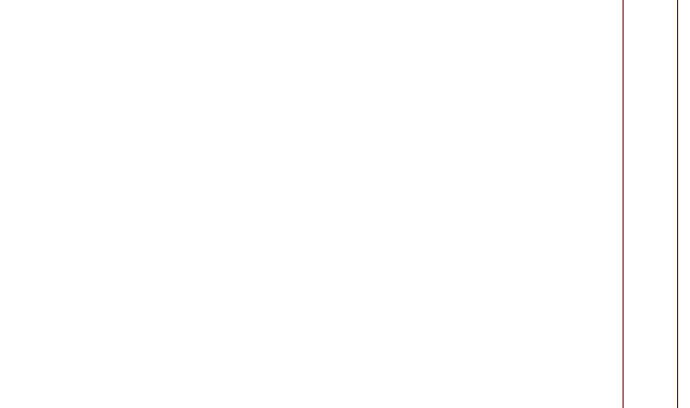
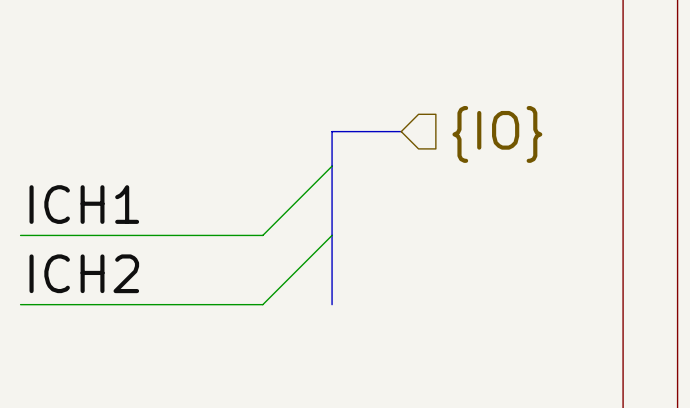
bus: none -> (401, 131) (332, 131) (332, 304)
hierarchical label: none -> {IO} (497, 134)
wire: none -> (332, 166) (262, 235) (20, 235)
label: none -> ICH1 (84, 204)
wire: none -> (332, 235) (262, 304) (20, 304)
label: none -> ICH2 (84, 273)

